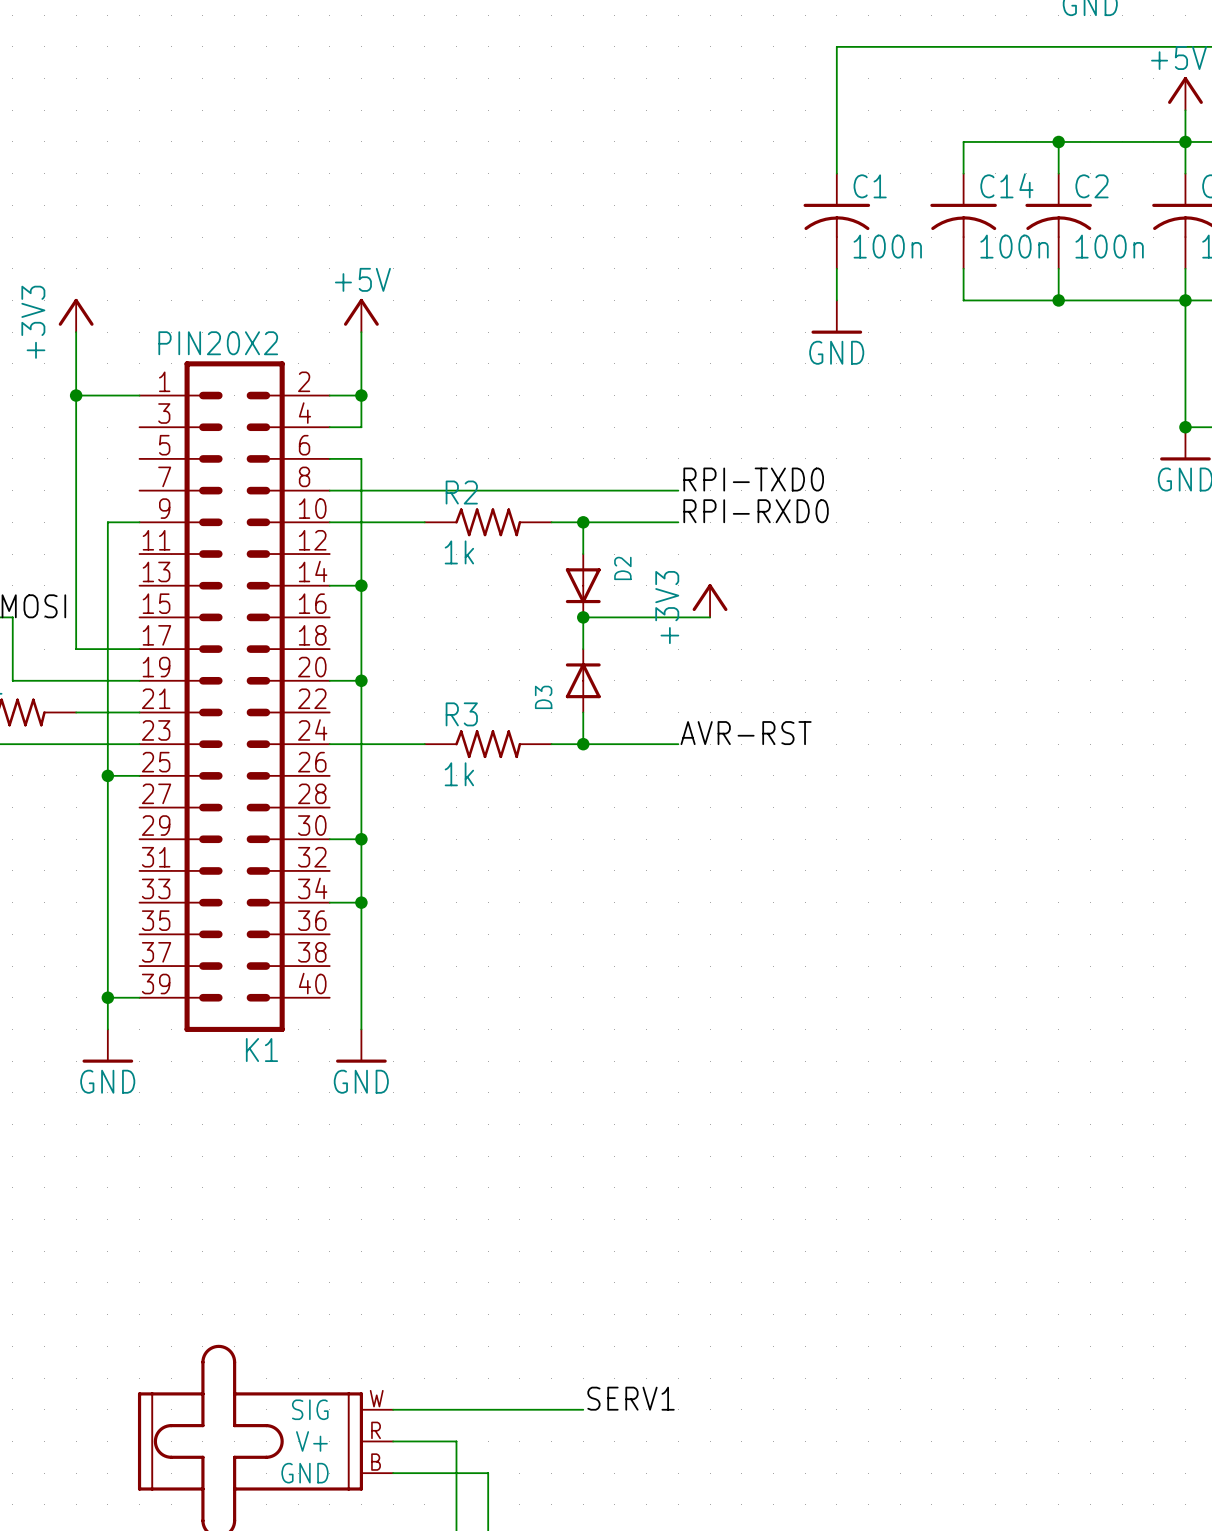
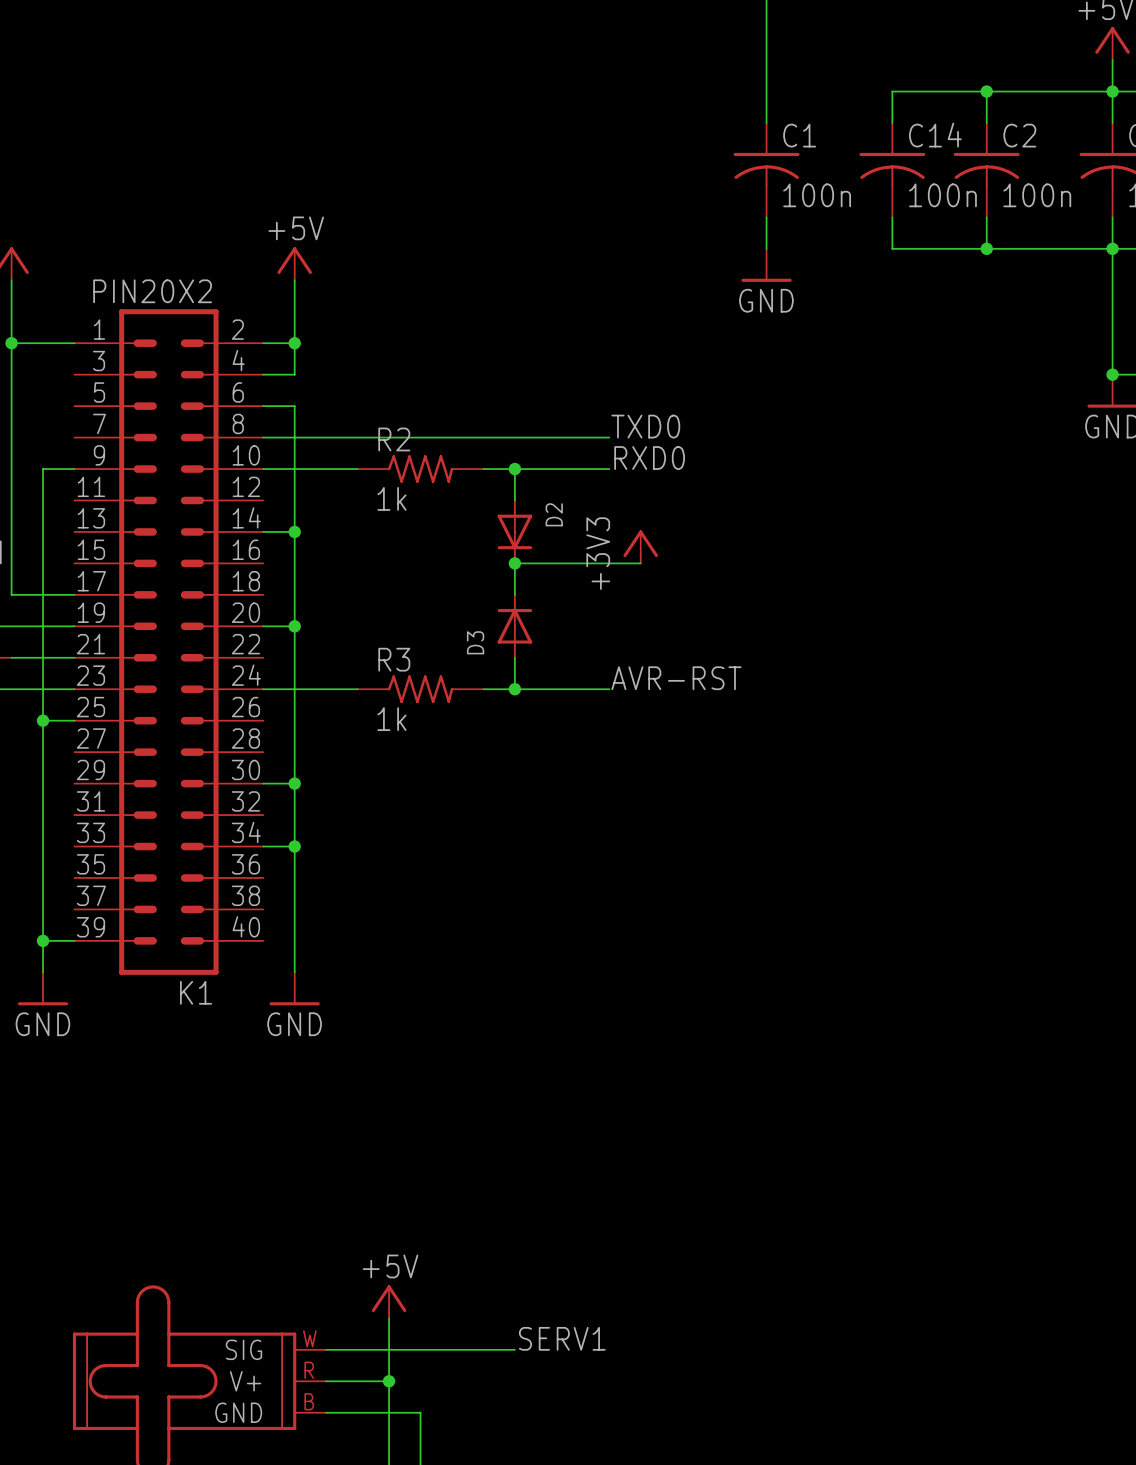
label: RPI-TXD0 (753, 479) -> TXD0 (645, 426)
label: RPI-RXD0 (756, 511) -> RXD0 (649, 458)
power symbol: none -> +5V (389, 1301)
wire: none -> (389, 1318) (389, 1381)
junction: none -> (389, 1381)

